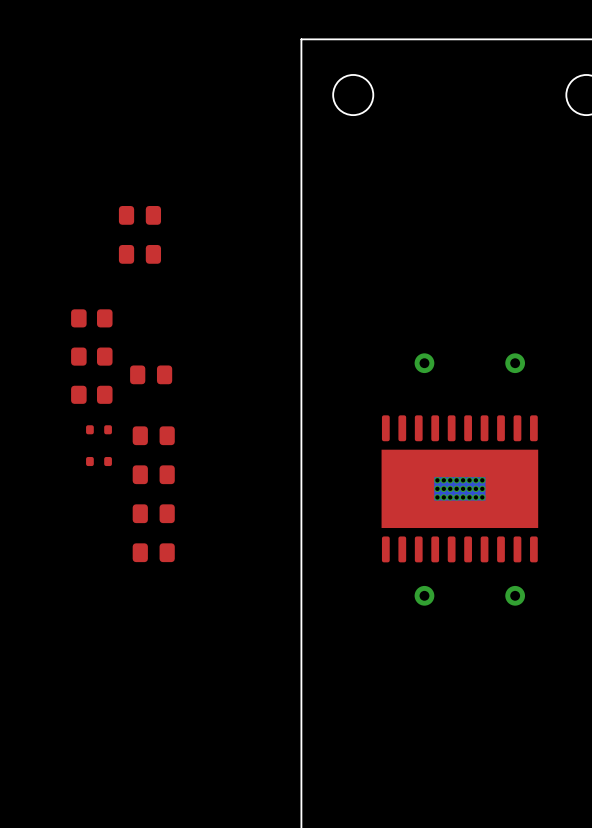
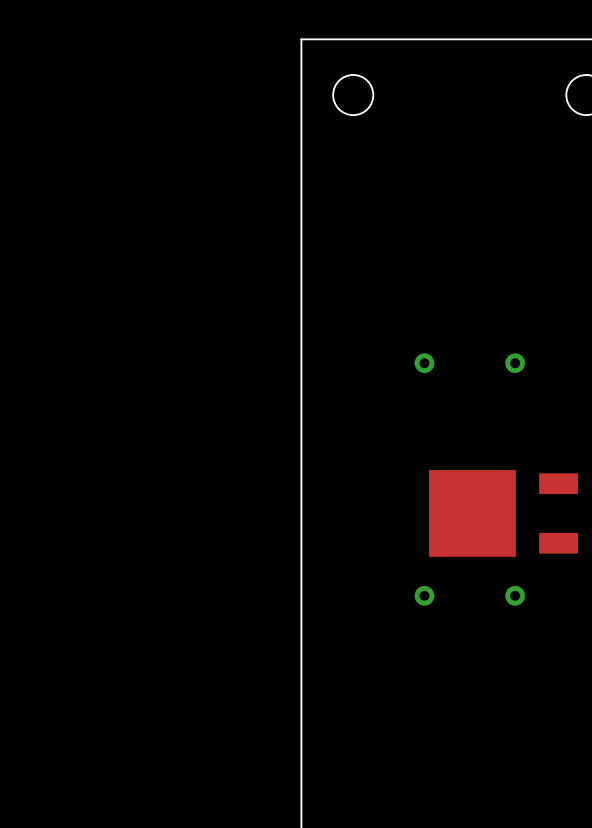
part: (139, 215) -> none
part: (139, 254) -> none
part: (91, 318) -> none
part: (91, 356) -> none
part: (151, 374) -> none
part: (91, 394) -> none
part: (99, 429) -> none
part: (153, 435) -> none
part: (99, 461) -> none
part: (153, 474) -> none
part: (459, 488) -> none
part: (153, 513) -> none
part: none -> (503, 513)
part: (153, 552) -> none

